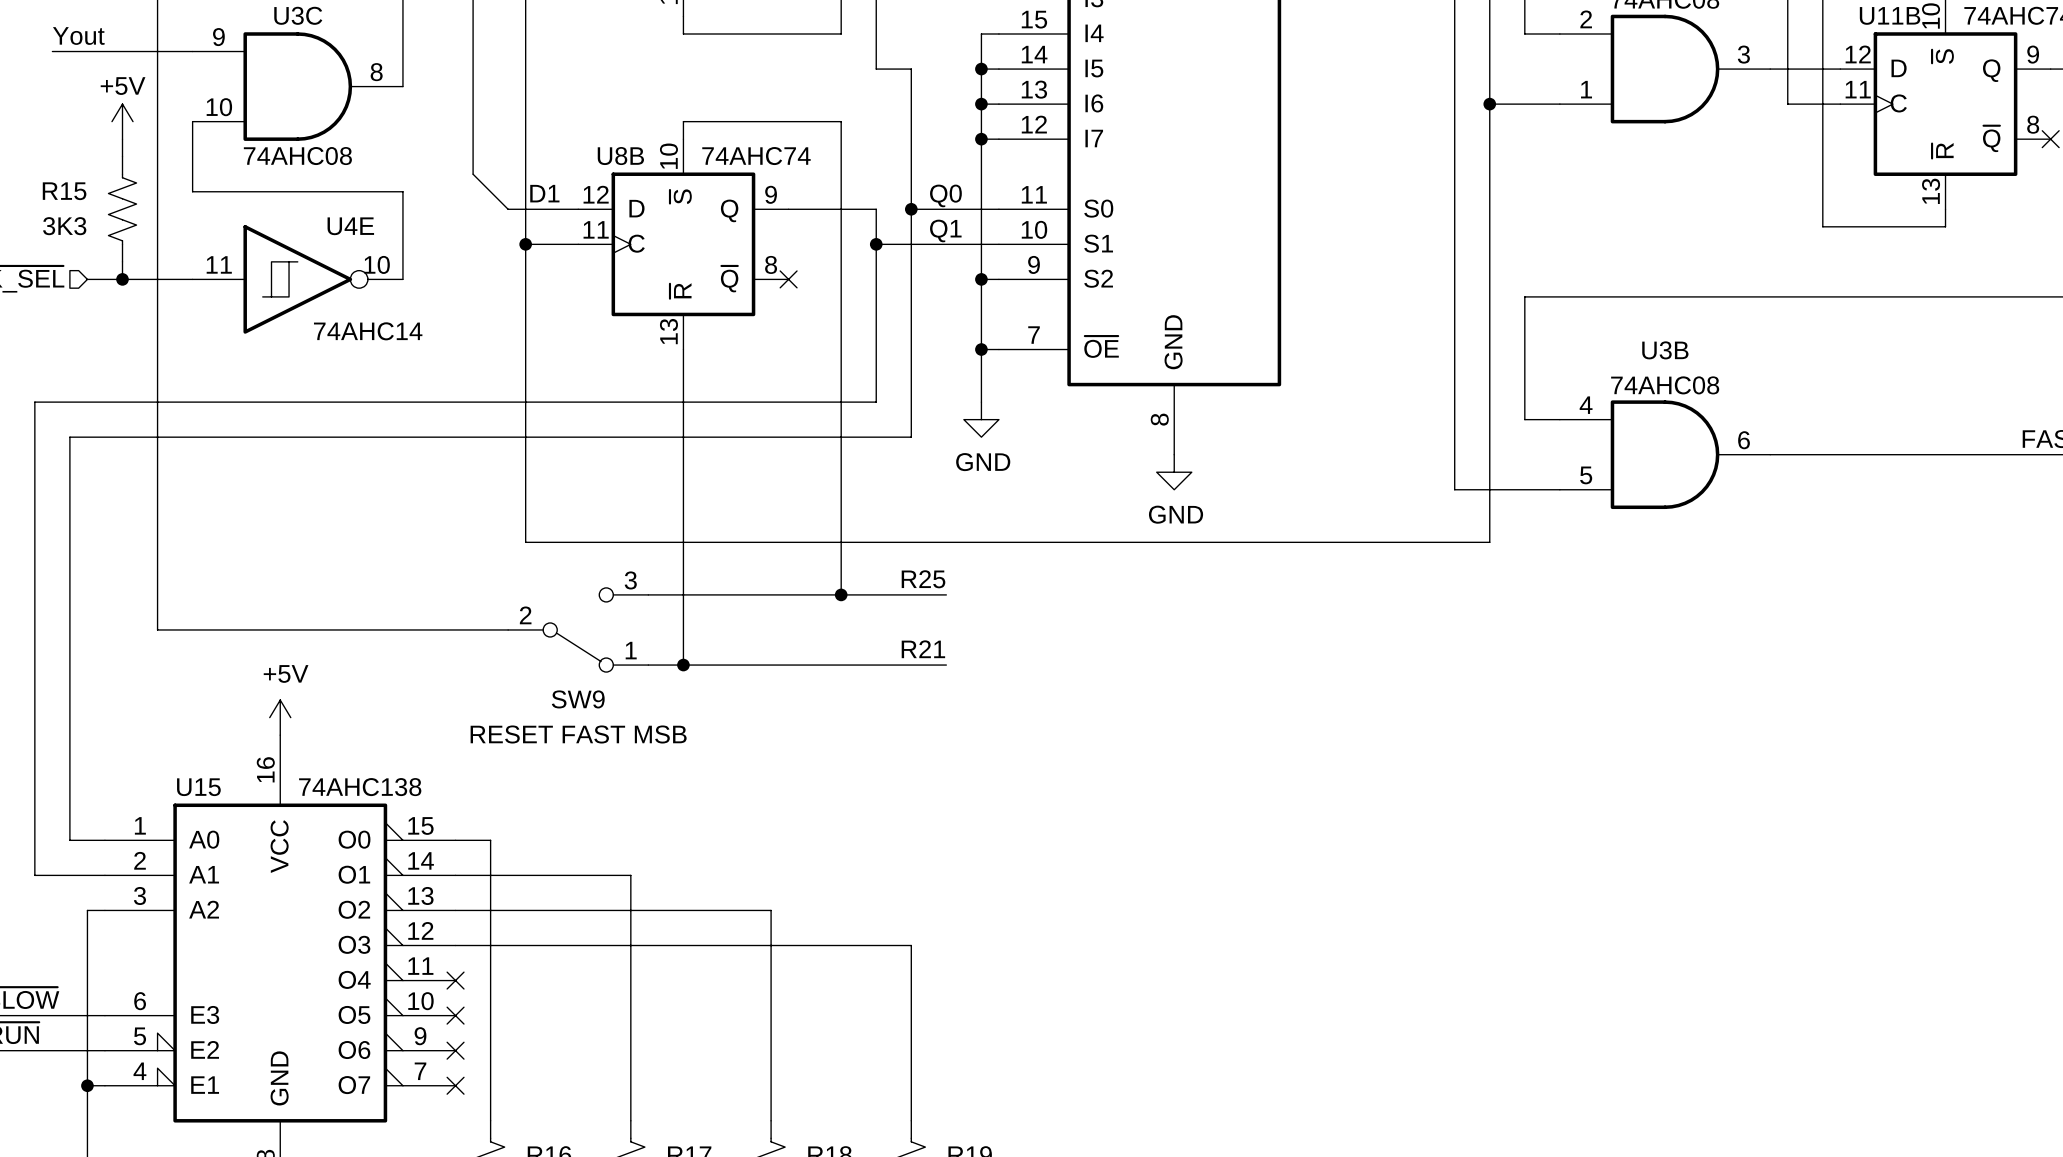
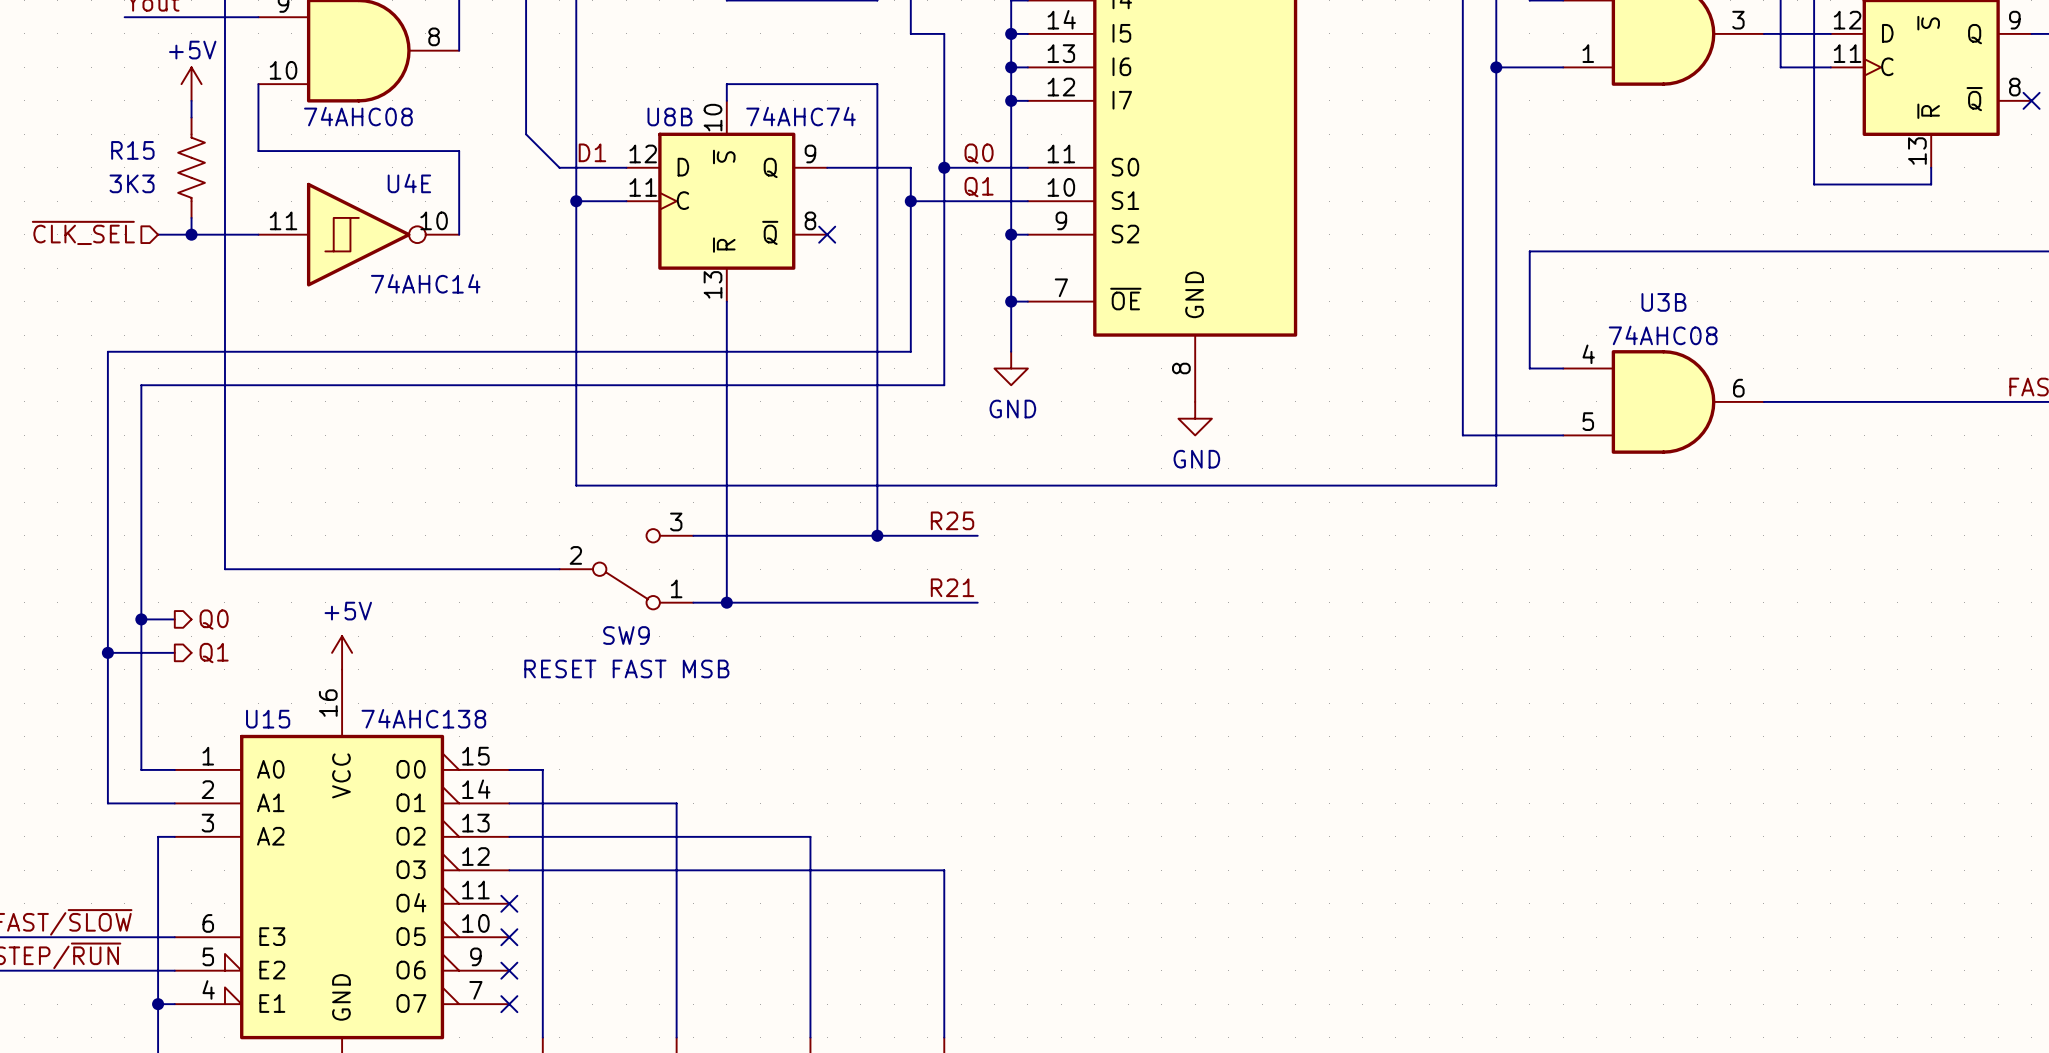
wire: none -> (141, 619) (174, 619)
junction: none -> (141, 619)
hierarchical label: none -> Q0 (214, 619)
wire: none -> (107, 652) (174, 652)
junction: none -> (107, 652)
hierarchical label: none -> Q1 (214, 653)

